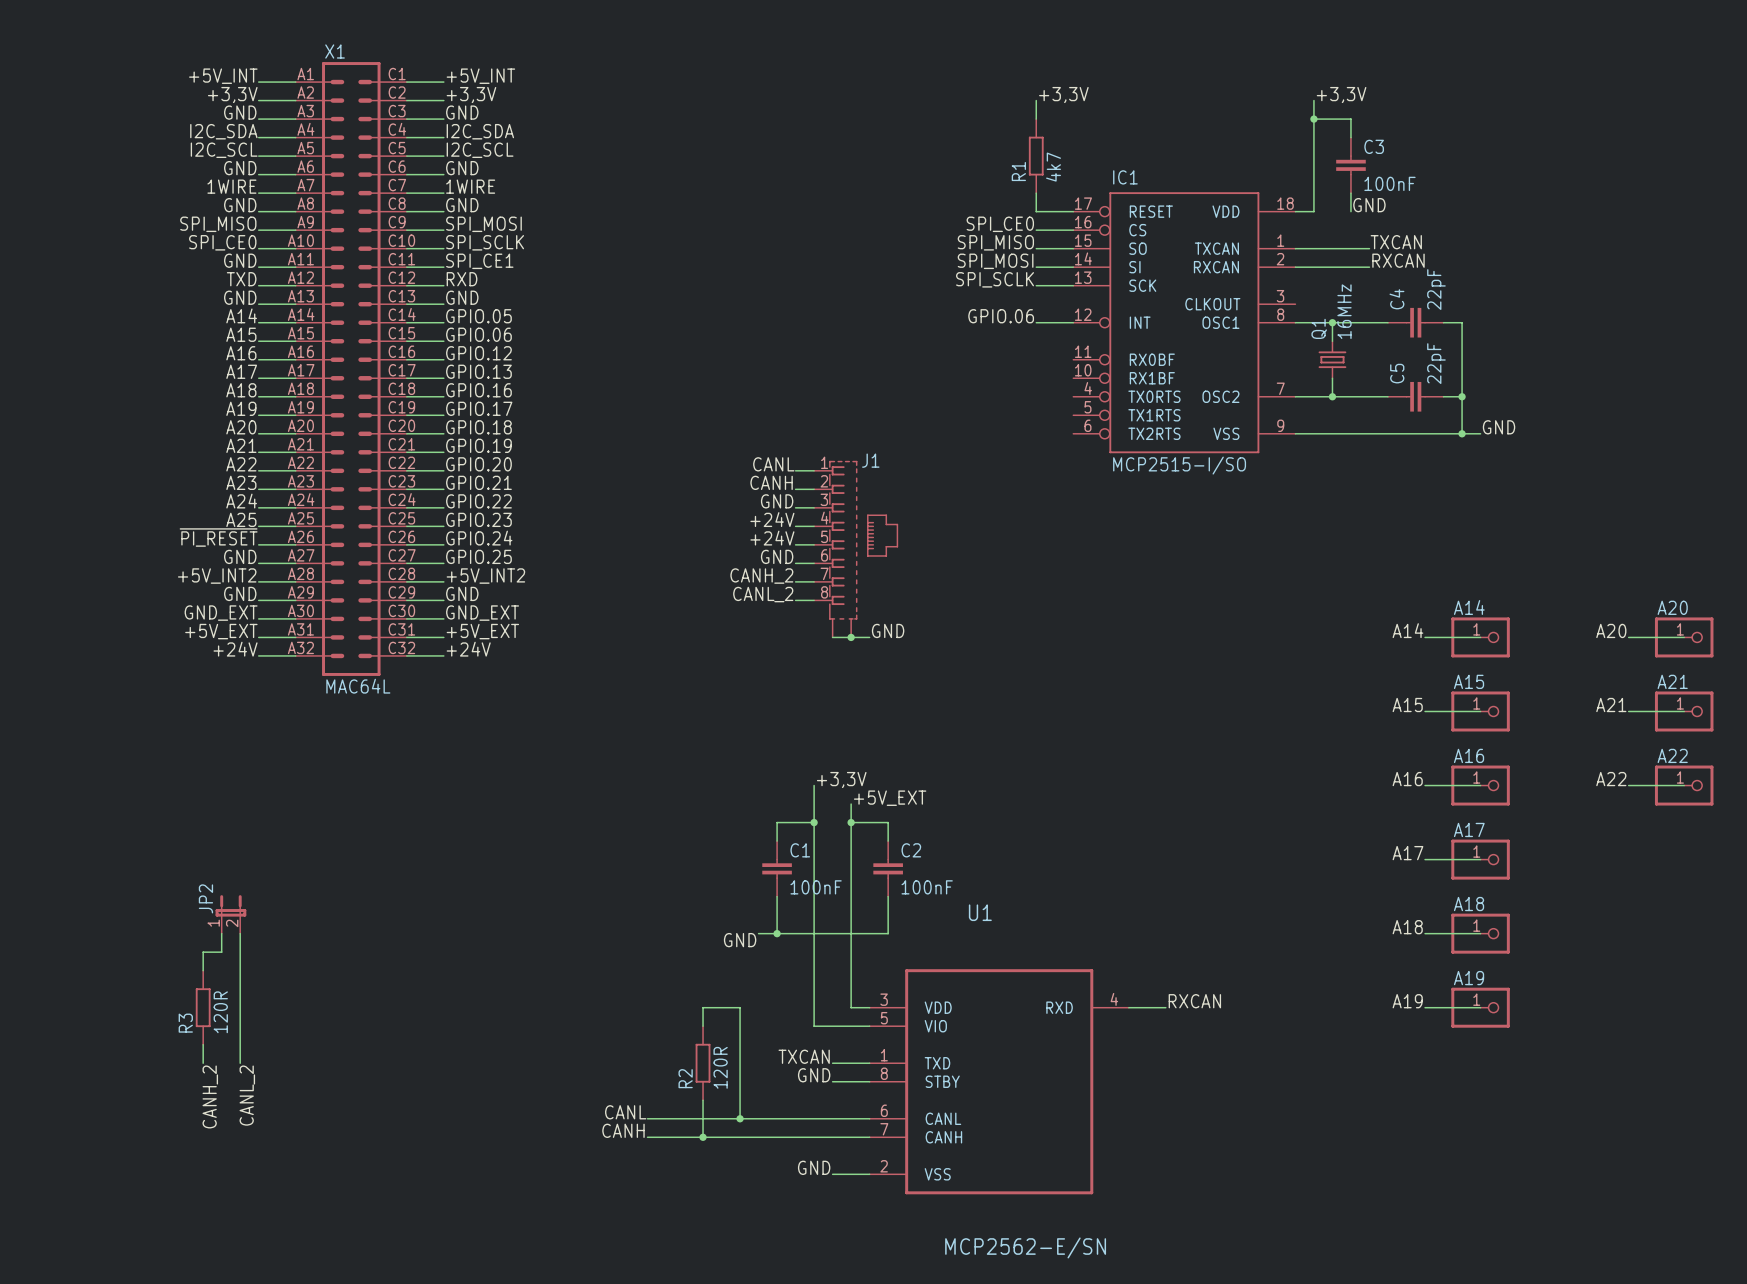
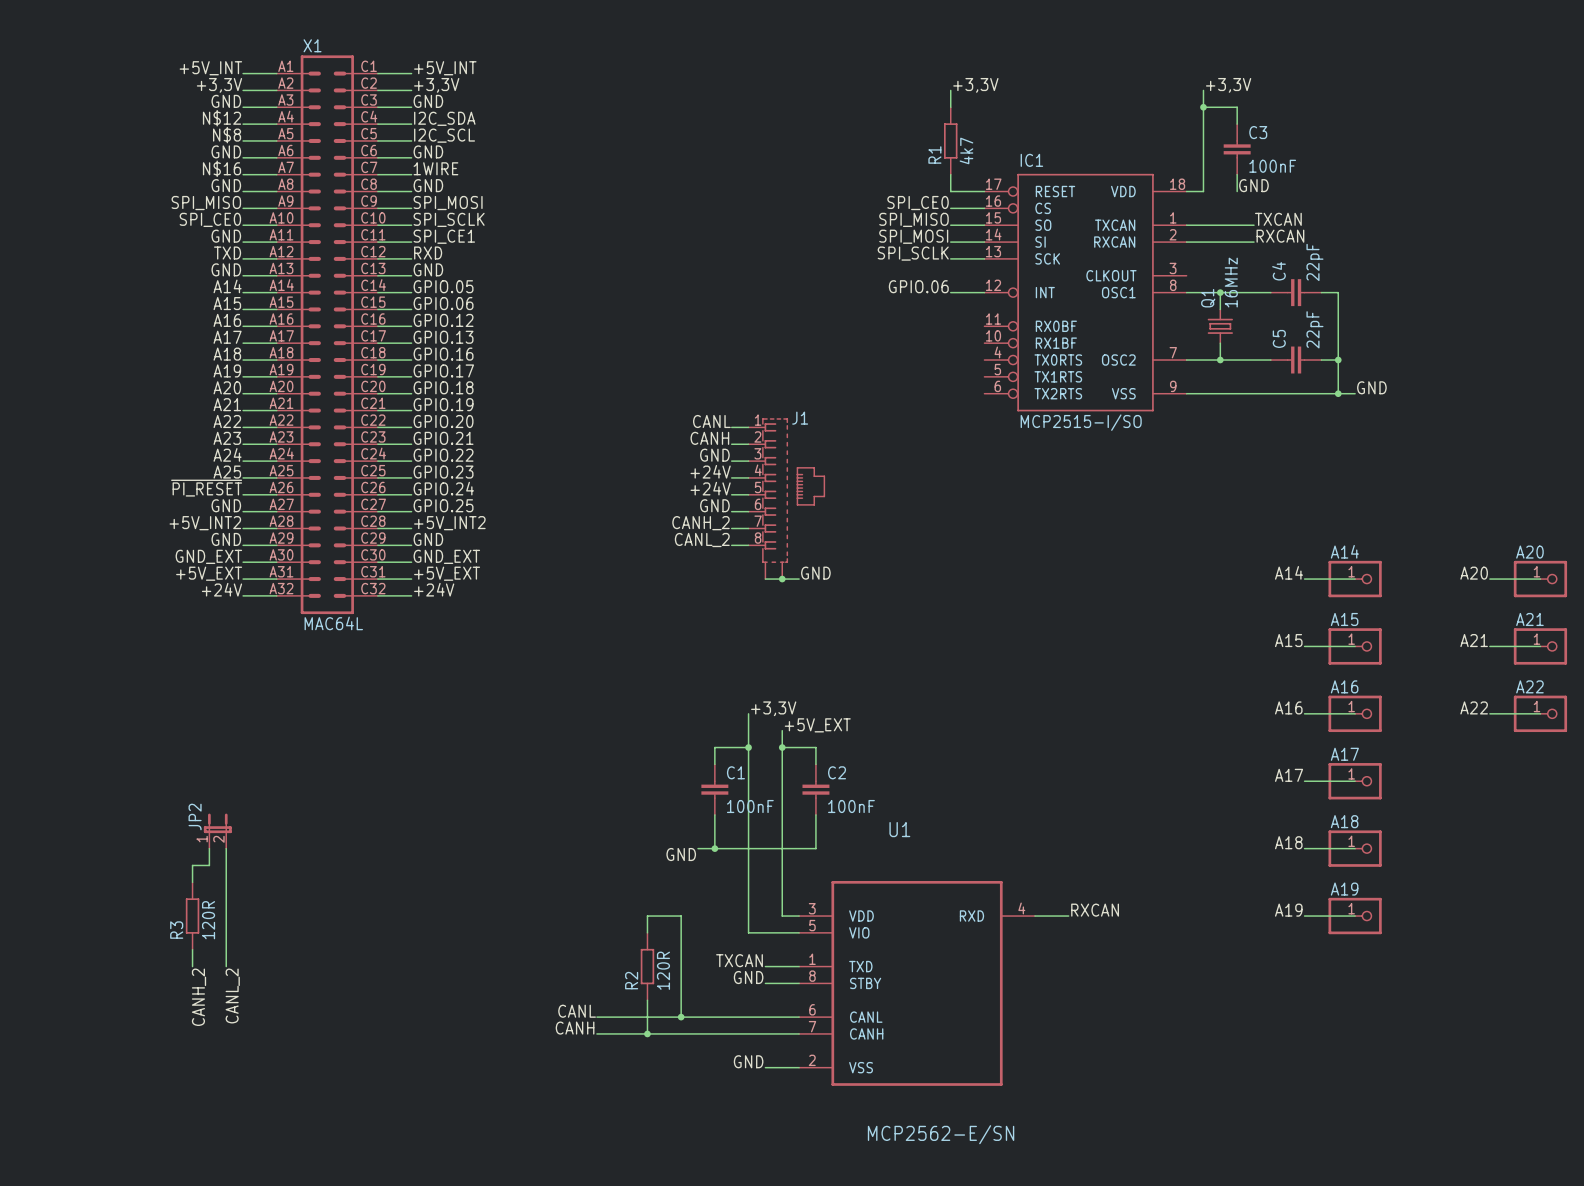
label: I2C_SDA (223, 131) -> N$12 (222, 118)
label: I2C_SCL (224, 150) -> N$8 (227, 135)
label: 1WIRE (231, 186) -> N$16 (222, 168)

